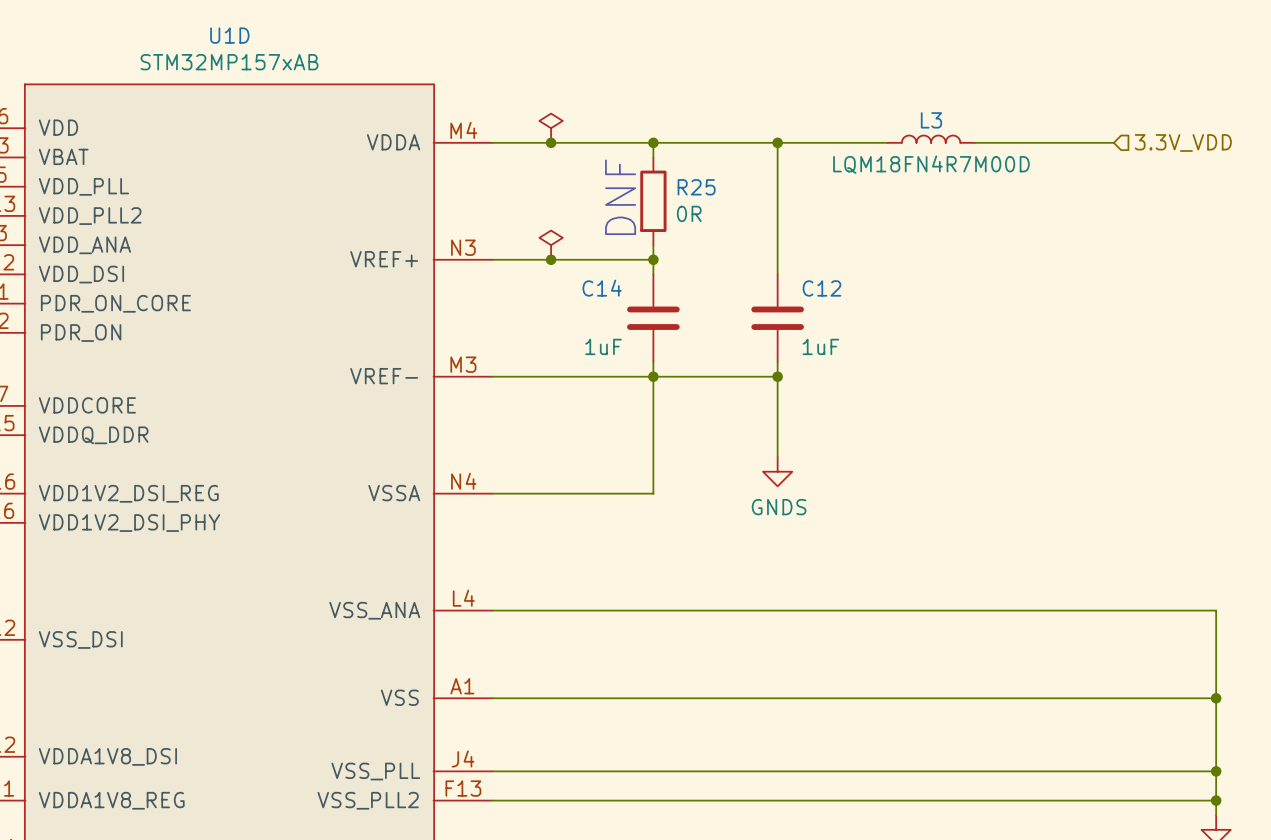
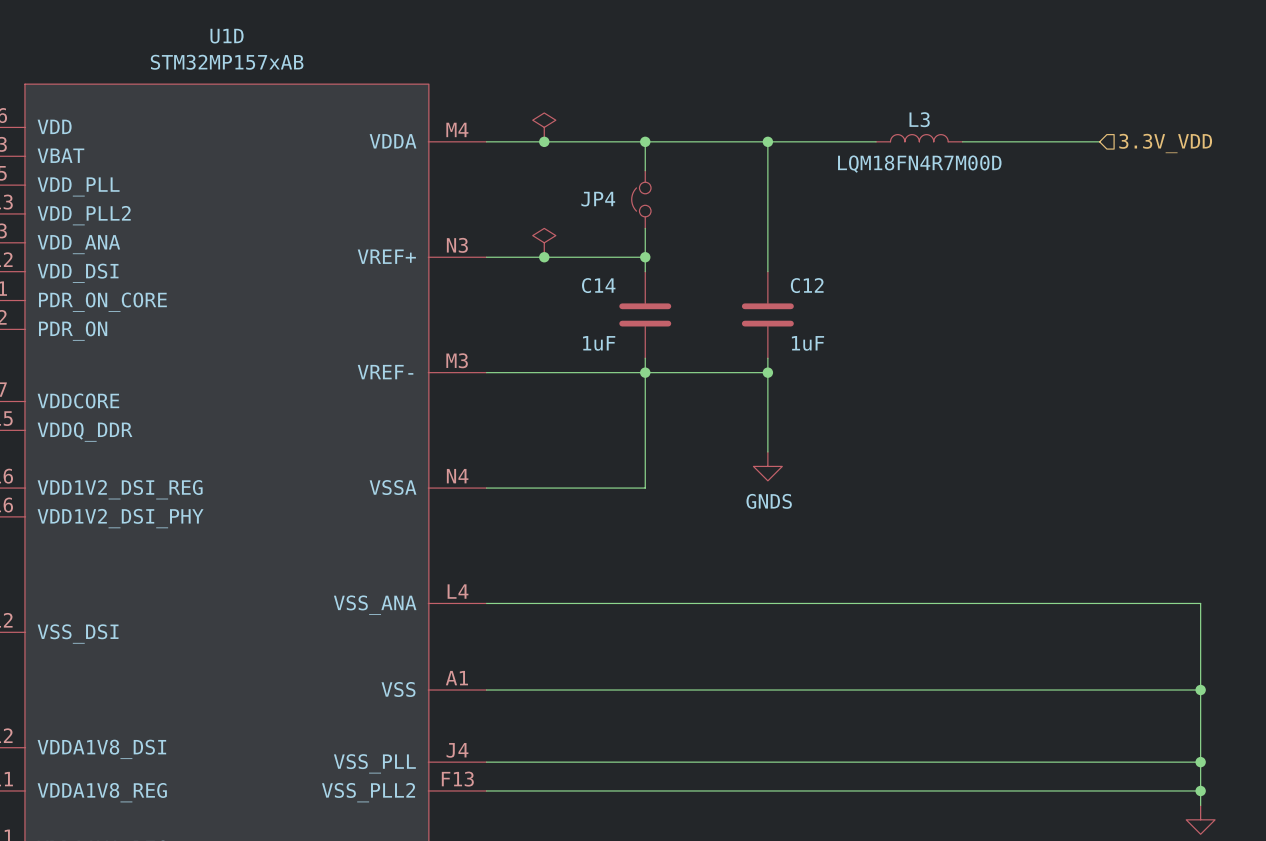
text: DNF (620, 197) -> none
JP4: none -> (641, 199)
R25: 0R (653, 201) -> none

